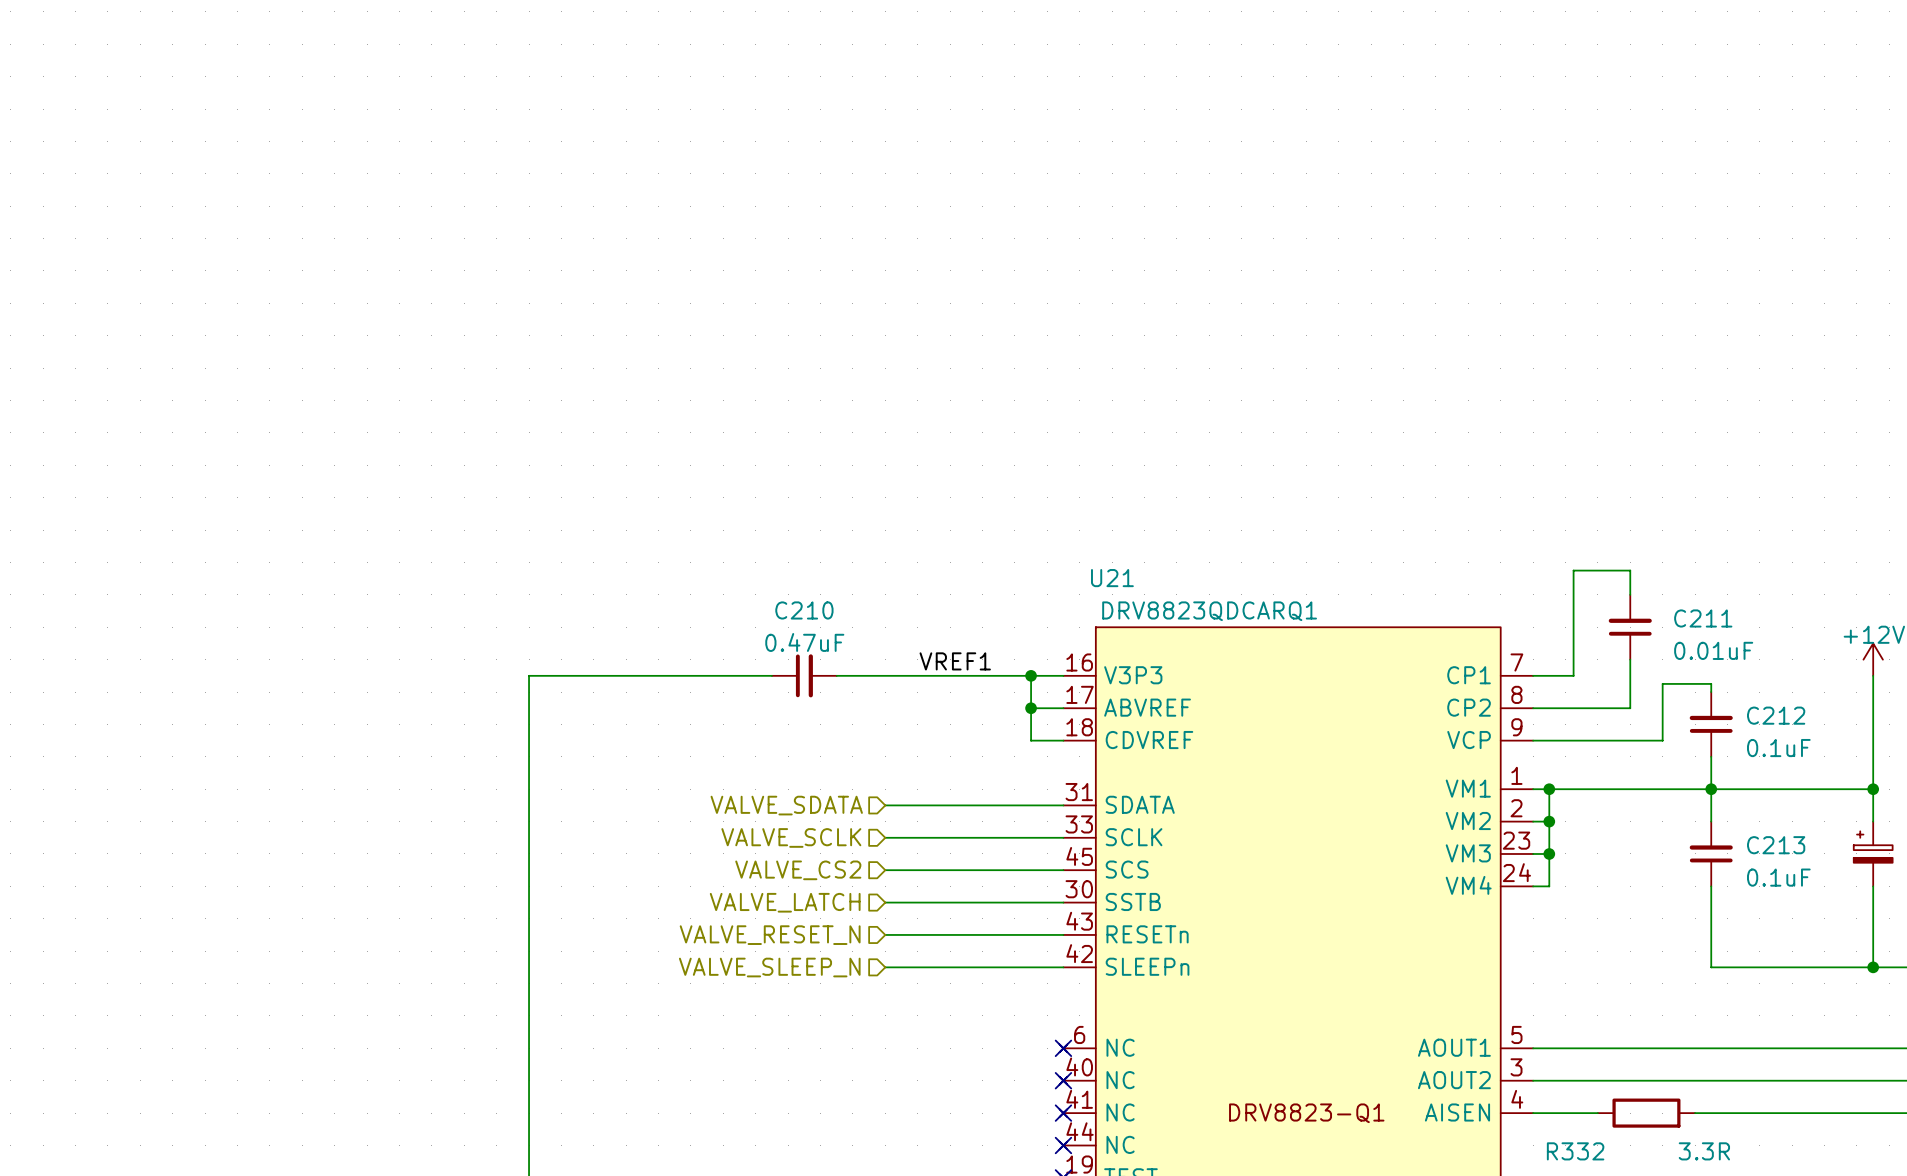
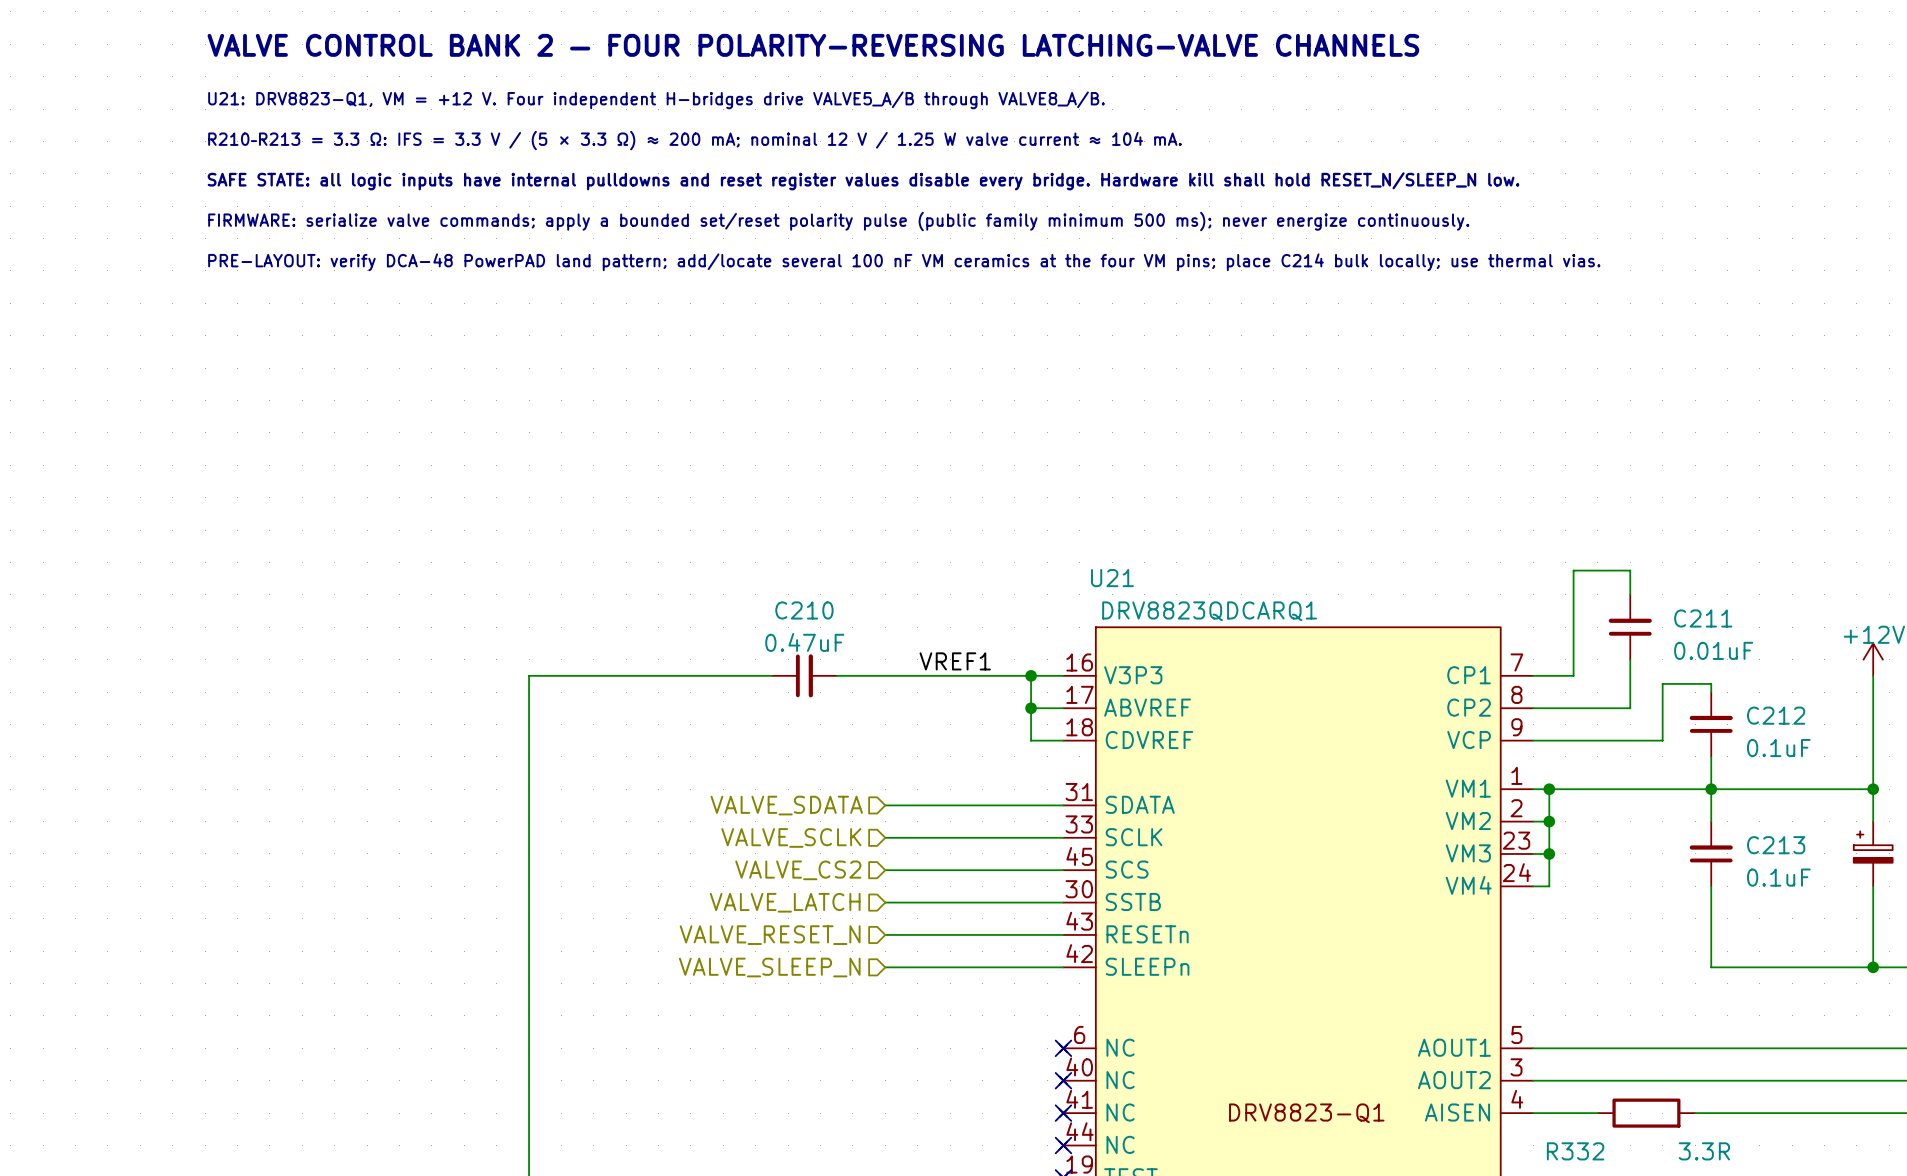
text: none -> VALVE CONTROL BANK 2 — FOUR POLARITY-REVERSING LATCHING-VALVE CHANNELS (813, 45)
text: none -> U21: DRV8823-Q1, VM = +12 V. Four independent H-bridges drive VALVE5_A/B through VALVE8_A/B. (656, 100)
text: none -> R210–R213 = 3.3 Ω: IFS = 3.3 V / (5 × 3.3 Ω) ≈ 200 mA; nominal 12 V / 1.25 W valve current ≈ 104 mA. (694, 140)
text: none -> SAFE STATE: all logic inputs have internal pulldowns and reset register values disable every bridge. Hardware kill shall hold RESET_N/SLEEP_N low. (863, 181)
text: none -> FIRMWARE: serialize valve commands; apply a bounded set/reset polarity pulse (public family minimum 500 ms); never energize continuously. (838, 221)
text: none -> PRE-LAYOUT: verify DCA-48 PowerPAD land pattern; add/locate several 100 nF VM ceramics at the four VM pins; place C214 bulk locally; use thermal vias. (904, 262)

